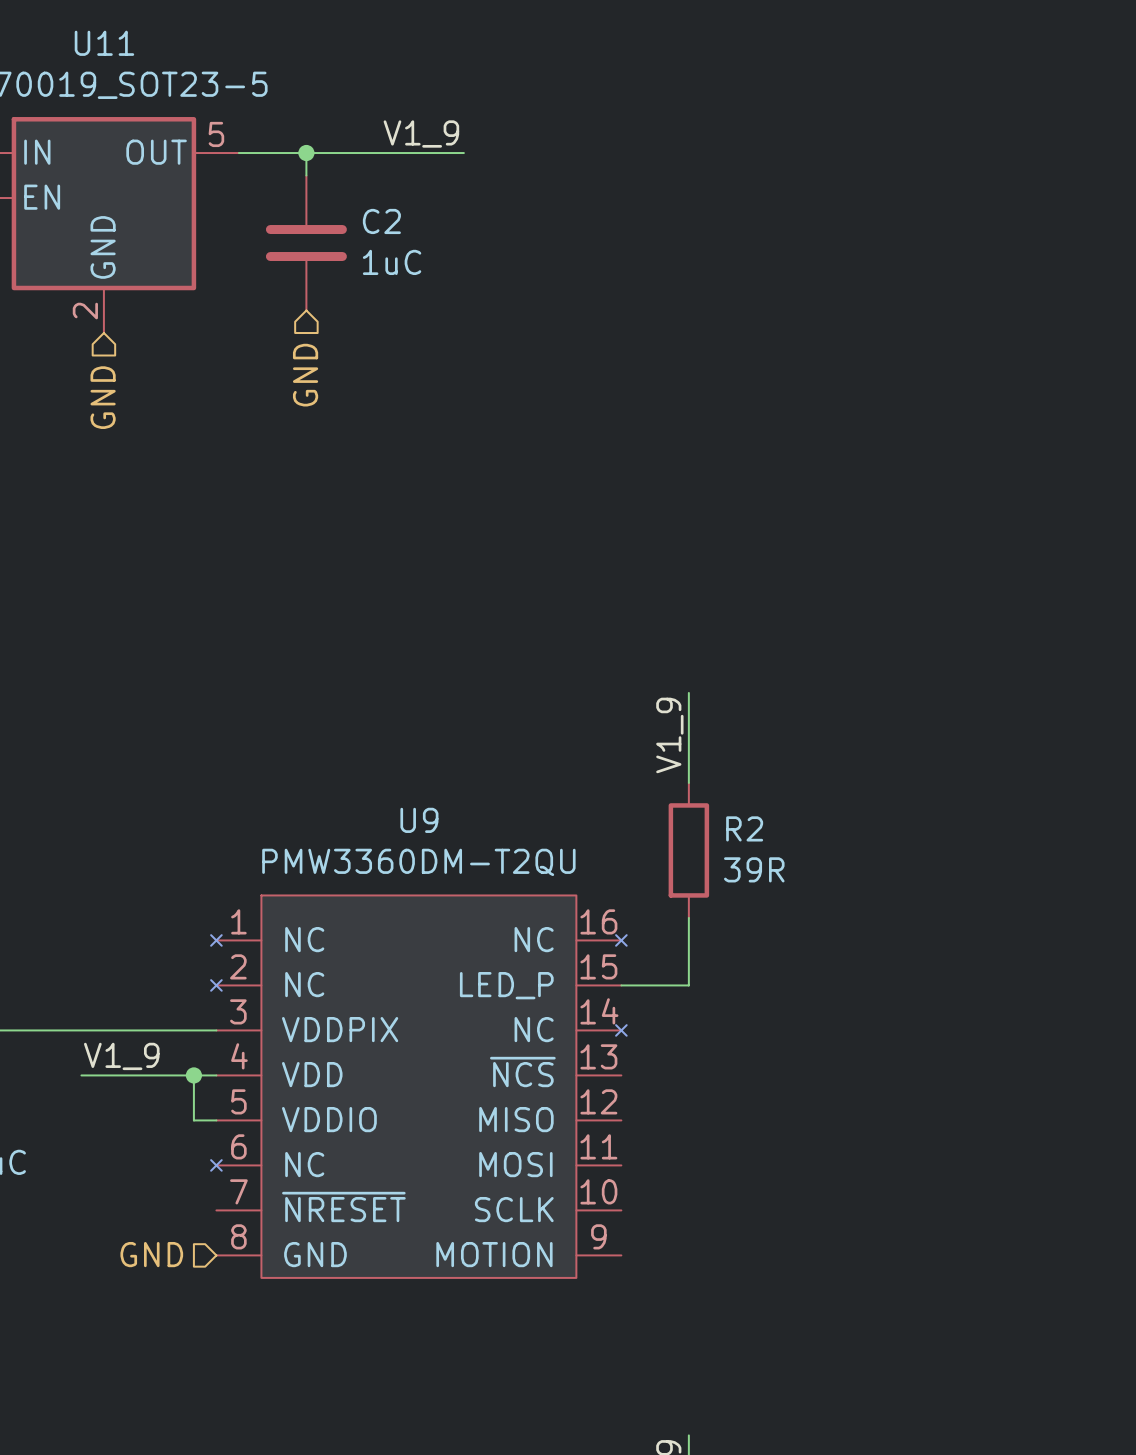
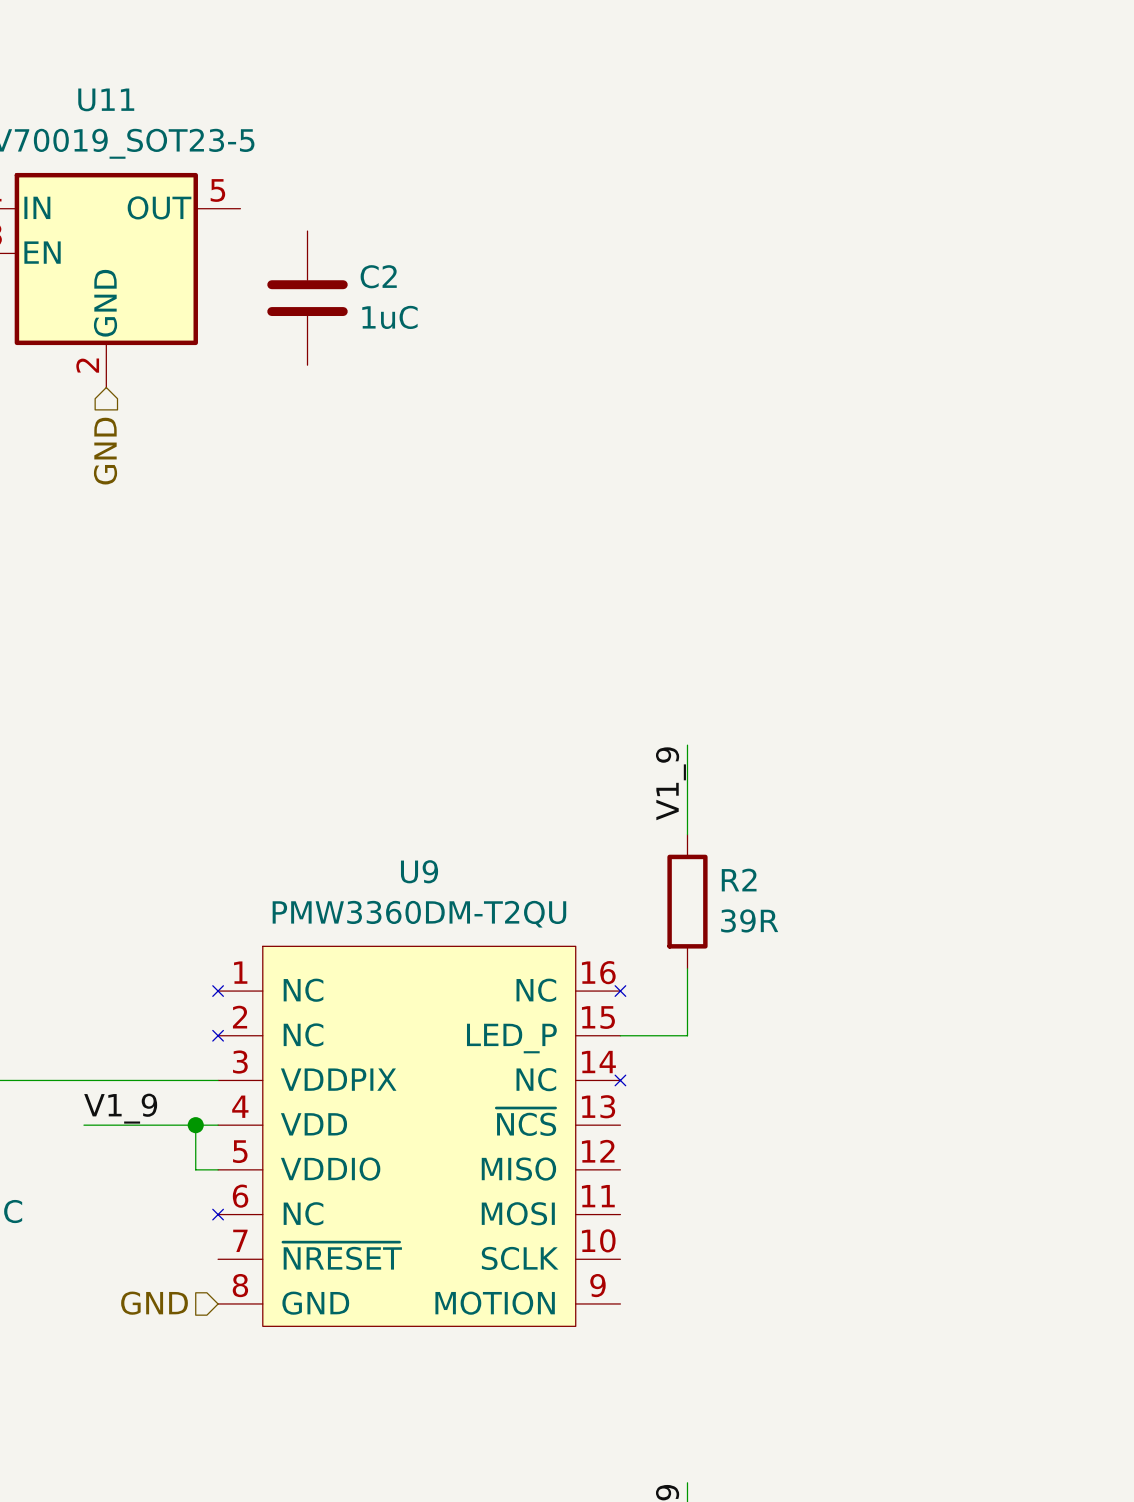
label: V1_9 (421, 134) -> none
wire: (238, 153) (463, 153) -> none
wire: (306, 153) (306, 175) -> none
junction: (306, 153) -> none
hierarchical label: GND (305, 375) -> none

